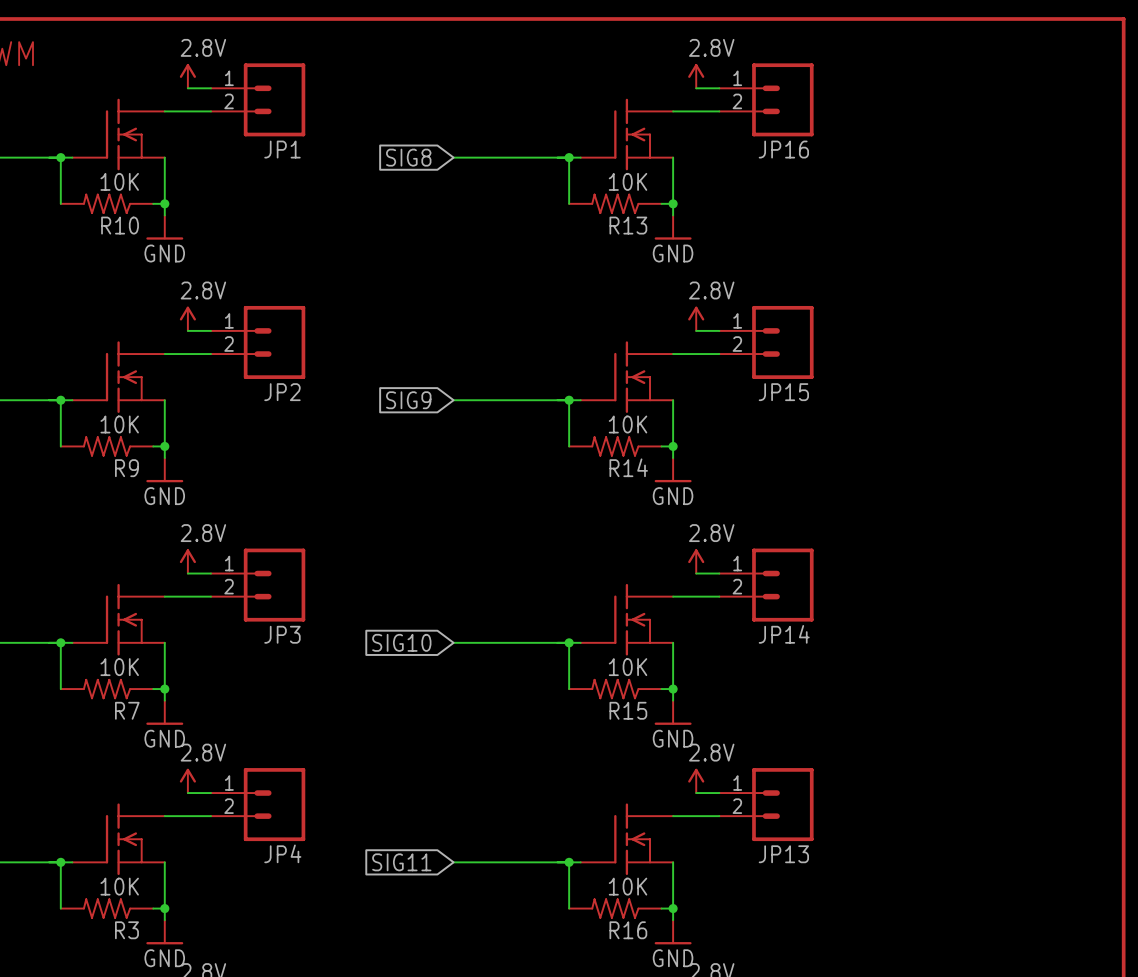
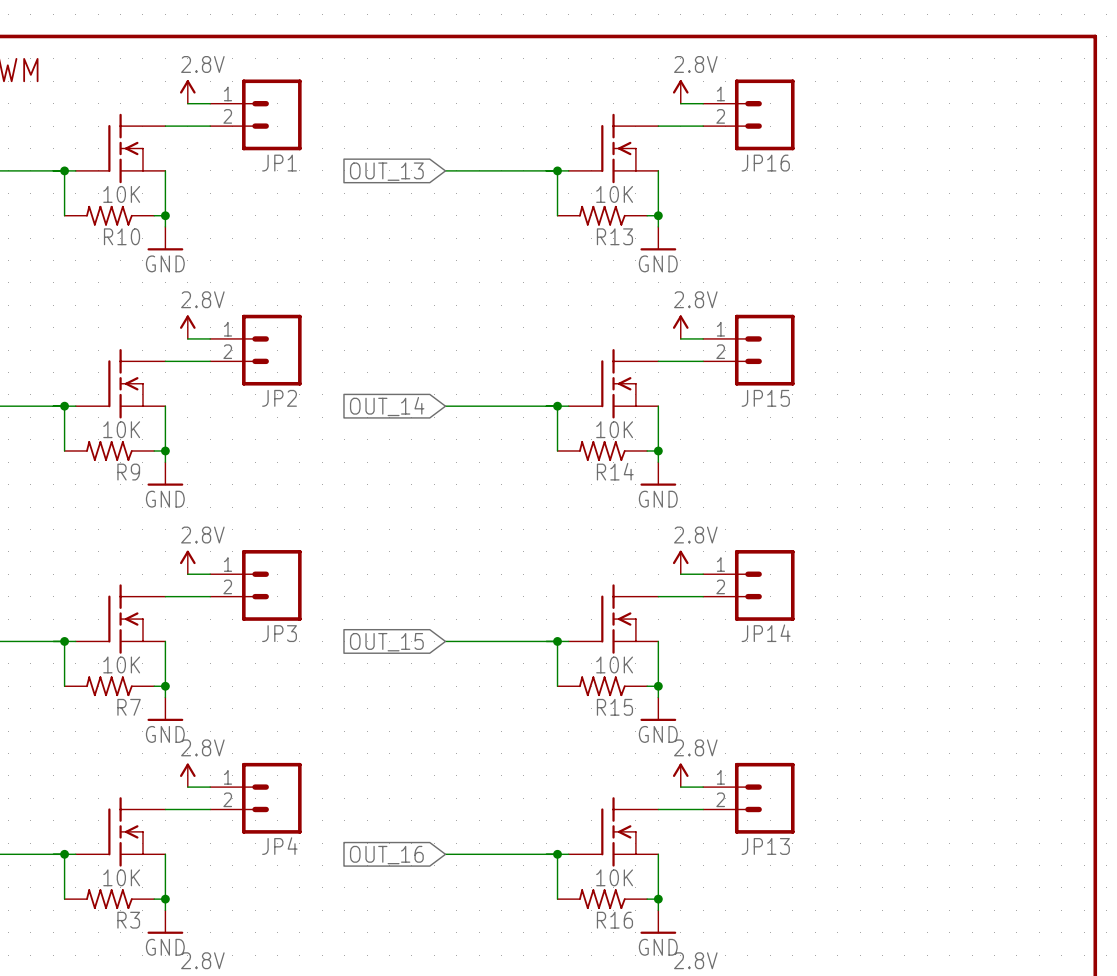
global label: SIG8 (408, 157) -> OUT_13 (386, 171)
global label: SIG9 (408, 400) -> OUT_14 (387, 406)
global label: SIG10 (401, 642) -> OUT_15 (386, 642)
global label: SIG11 (401, 862) -> OUT_16 (386, 855)

